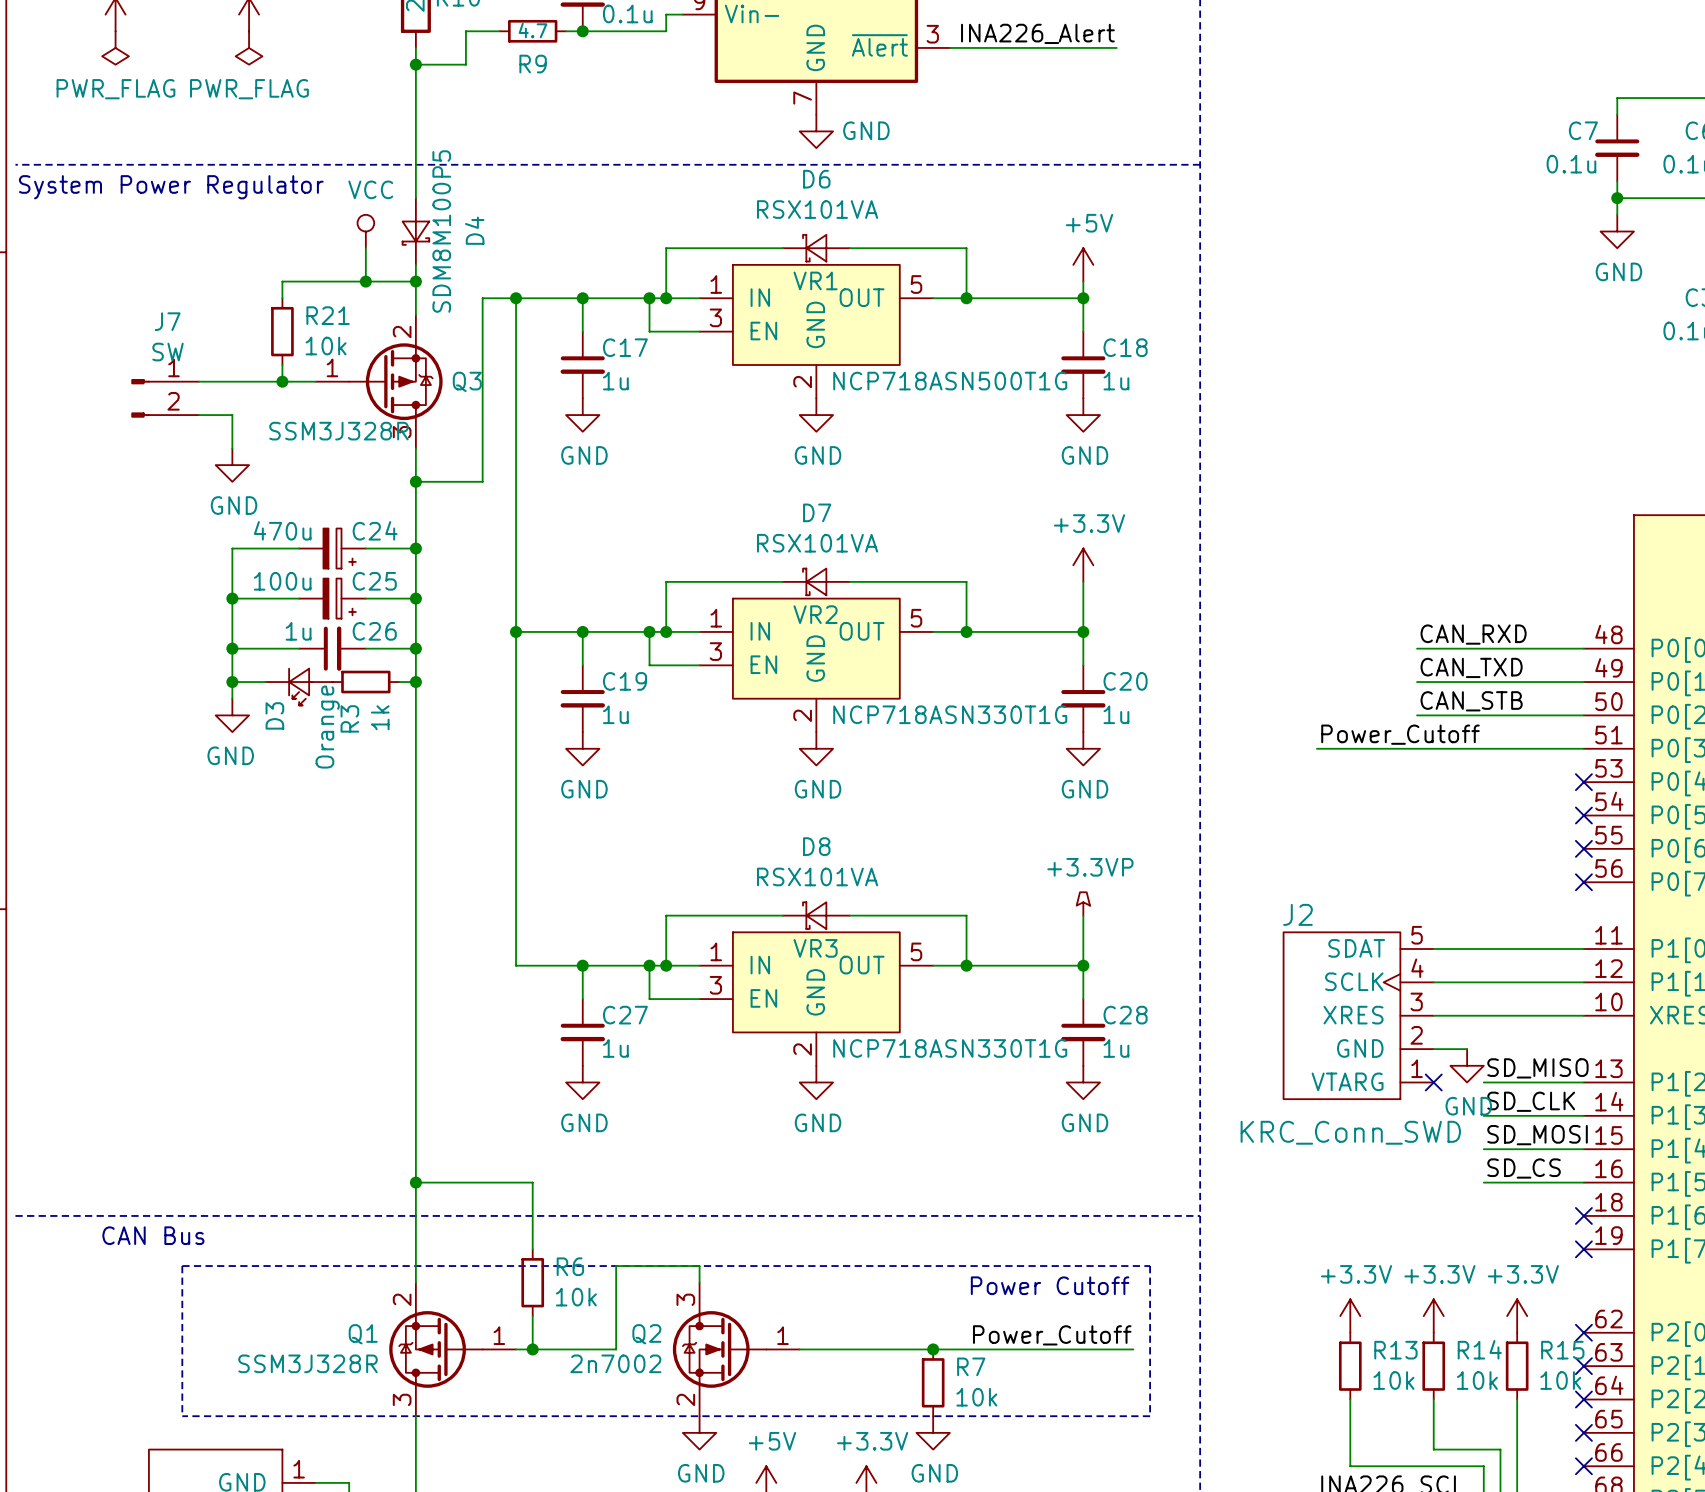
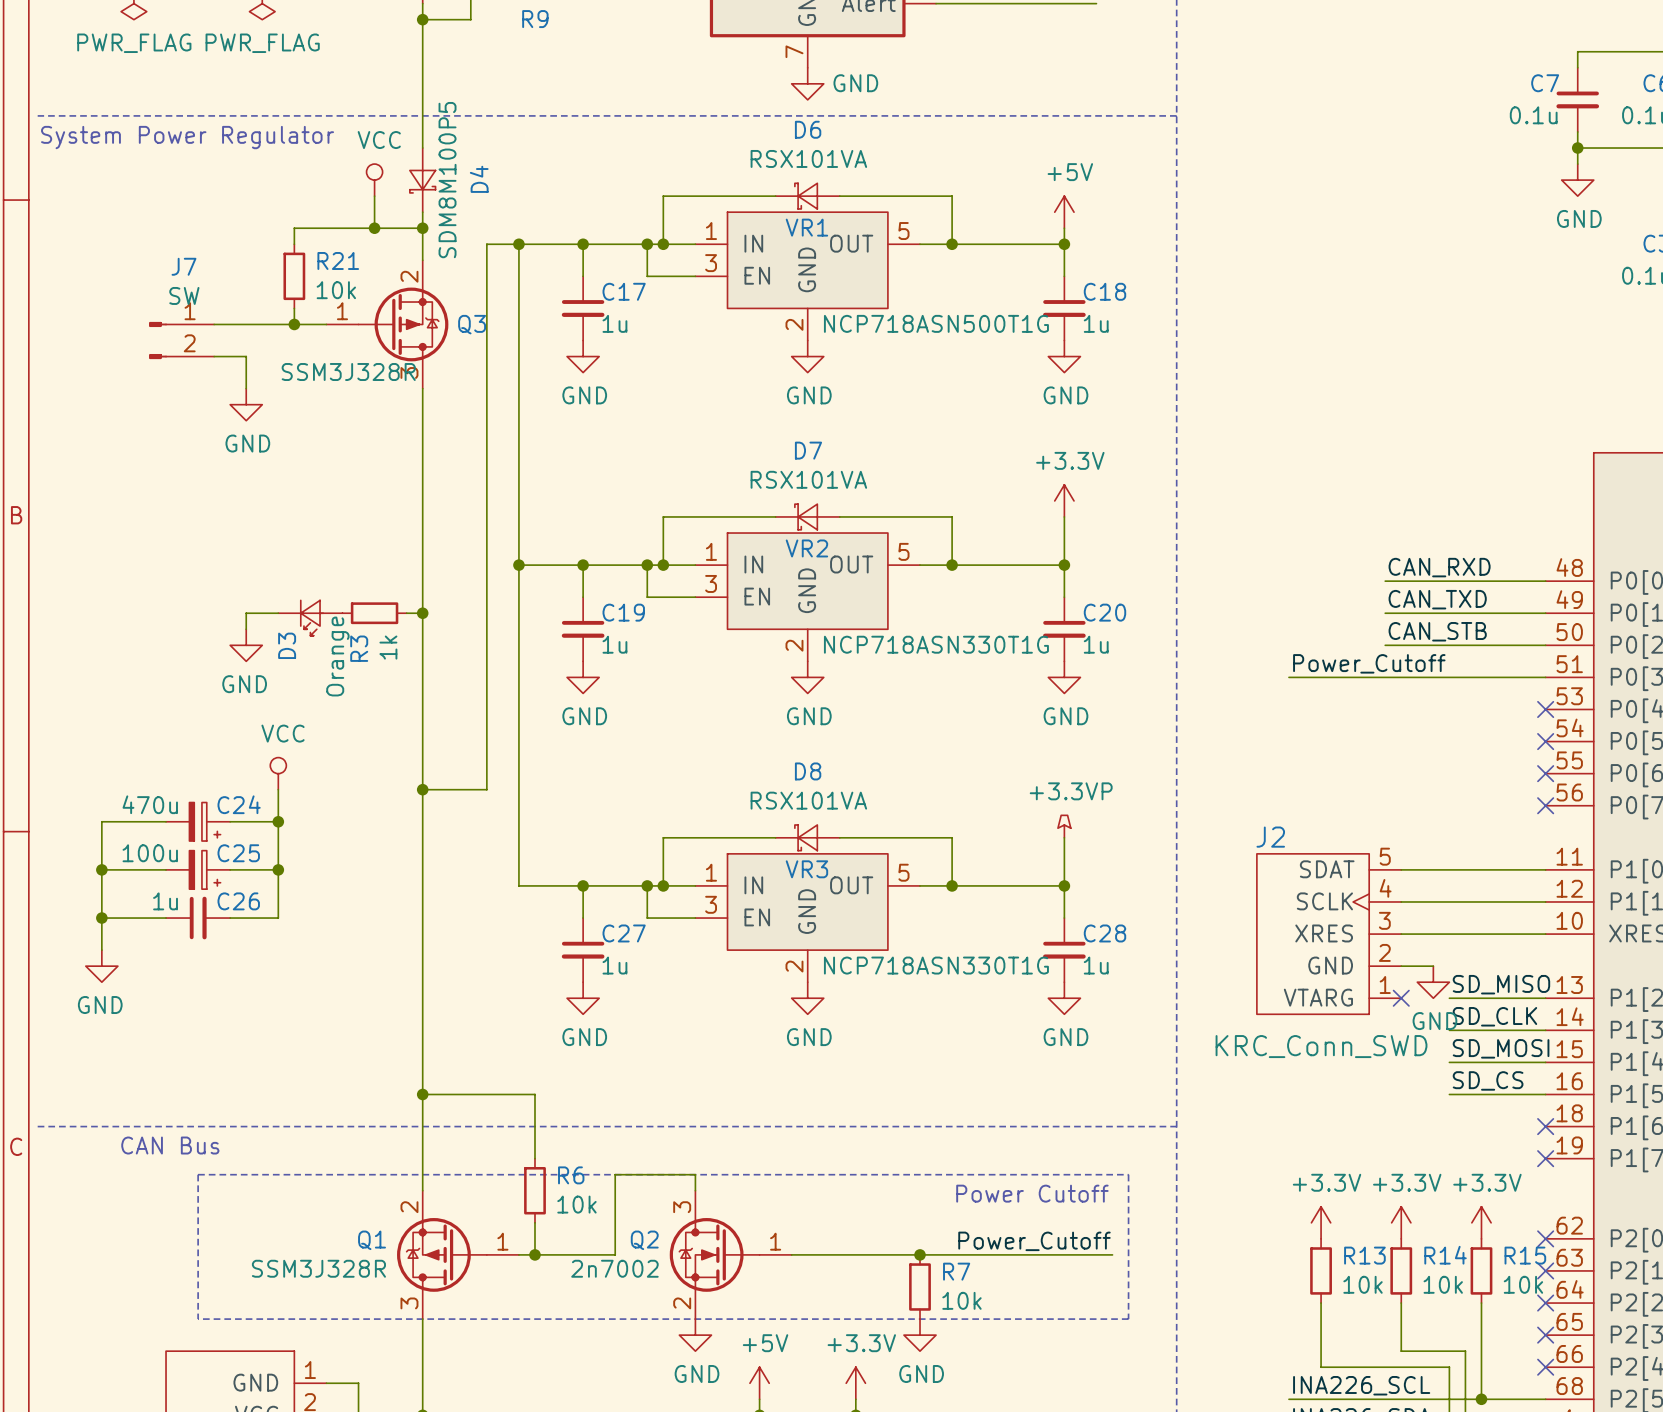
wire: (415, 481) (482, 481) -> (422, 789) (486, 789) (486, 420)
junction: (415, 481) -> none
wire: (299, 548) (232, 548) (232, 682) -> none
C24 position: (332, 548) -> (198, 821)
wire: (365, 548) (415, 548) -> none
junction: (415, 548) -> none
wire: (232, 598) (299, 598) -> none
junction: (232, 598) -> none
C25 position: (332, 598) -> (198, 869)
wire: (365, 598) (415, 598) -> none
junction: (415, 598) -> none
wire: (232, 648) (299, 648) -> none
junction: (232, 648) -> none
C26 position: (332, 648) -> (198, 918)
wire: (365, 648) (415, 648) -> (230, 821) (278, 821)
junction: (415, 648) -> none
junction: (232, 682) -> none
power symbol: none -> VCC (278, 773)
wire: none -> (278, 789) (278, 918) (230, 918)
junction: none -> (422, 789)
wire: none -> (166, 821) (101, 821) (101, 950)
junction: none -> (278, 821)
wire: none -> (101, 869) (166, 869)
junction: none -> (101, 869)
wire: none -> (230, 869) (278, 869)
junction: none -> (278, 869)
wire: none -> (101, 918) (166, 918)
junction: none -> (101, 918)
power symbol: none -> GND (101, 966)

